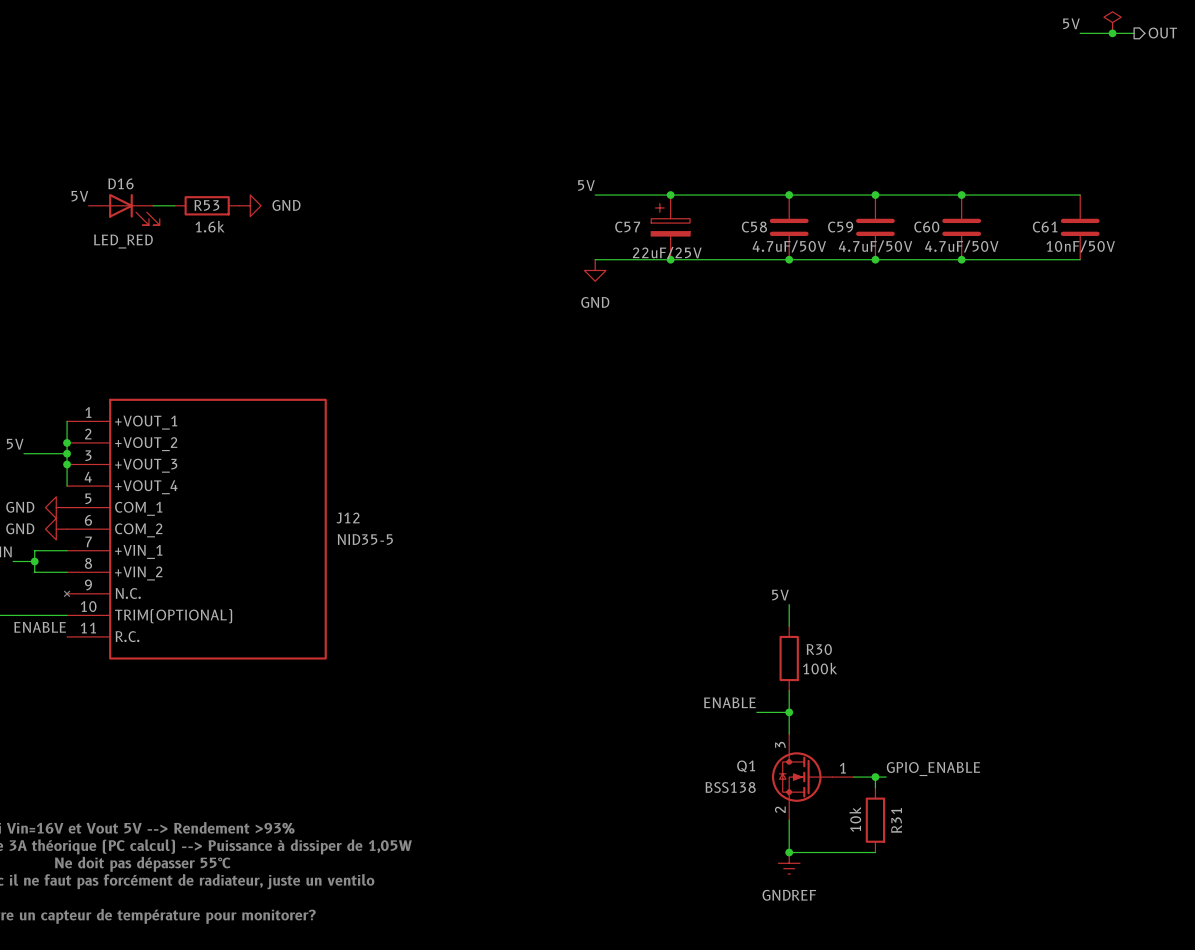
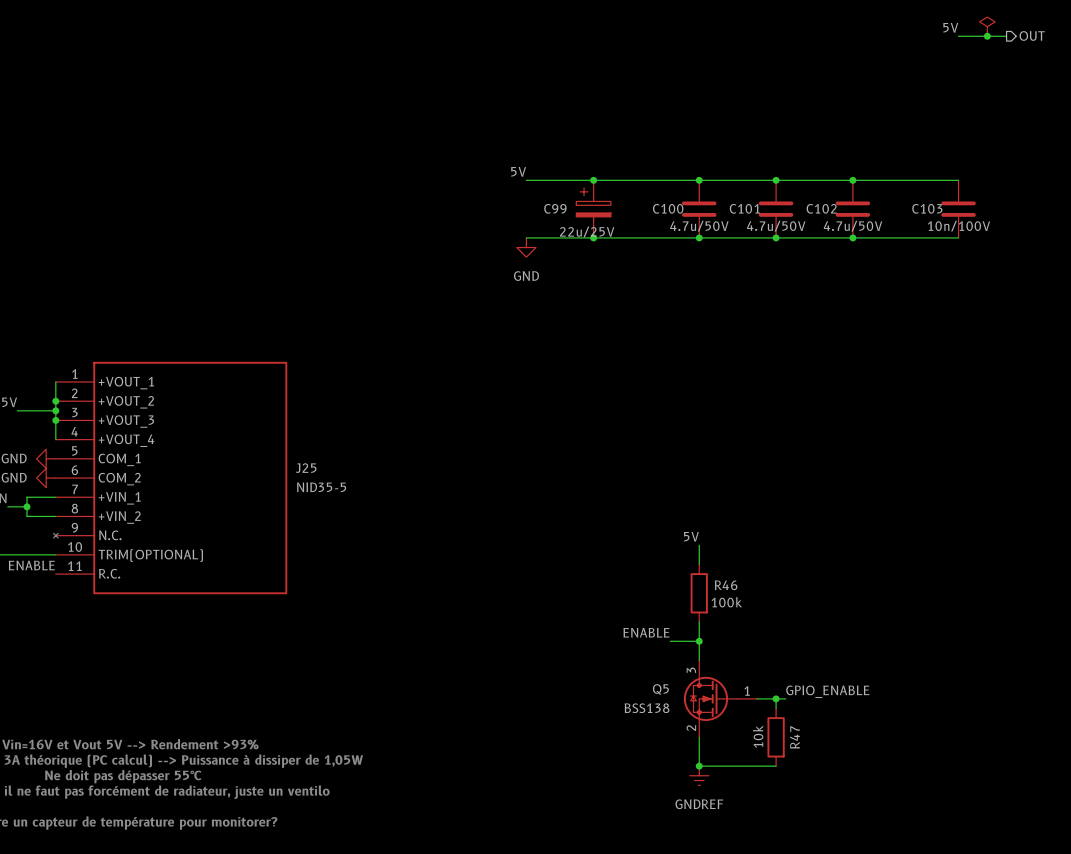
label: 5V (79, 196) -> none
wire: (153, 205) (174, 205) -> none
R53: 1.6k (207, 205) -> none
power symbol: GND (250, 205) -> none
D16: LED_RED (124, 209) -> none
C57 name: C57 (627, 227) -> C99 (555, 208)
C58 name: C58 (754, 227) -> C100 (668, 208)
C59 name: C59 (840, 227) -> C101 (744, 208)
C60 name: C60 (926, 227) -> C102 (821, 208)
C61 name: C61 (1045, 227) -> C103 (927, 208)
C58 value: 4.7uF/50V (789, 246) -> 4.7u/50V (699, 226)
C59 value: 4.7uF/50V (875, 246) -> 4.7u/50V (776, 226)
C60 value: 4.7uF/50V (961, 246) -> 4.7u/50V (853, 226)
C61 value: 10nF/50V (1080, 246) -> 10n/100V (958, 226)
C57 value: 22uF/25V (667, 252) -> 22u/25V (587, 231)
J12 name: J12 (348, 518) -> J25 (306, 468)
R30 name: R30 (819, 649) -> R46 (726, 585)
Q1 name: Q1 (746, 766) -> Q5 (660, 689)
R31 name: R31 (896, 820) -> R47 (794, 737)

